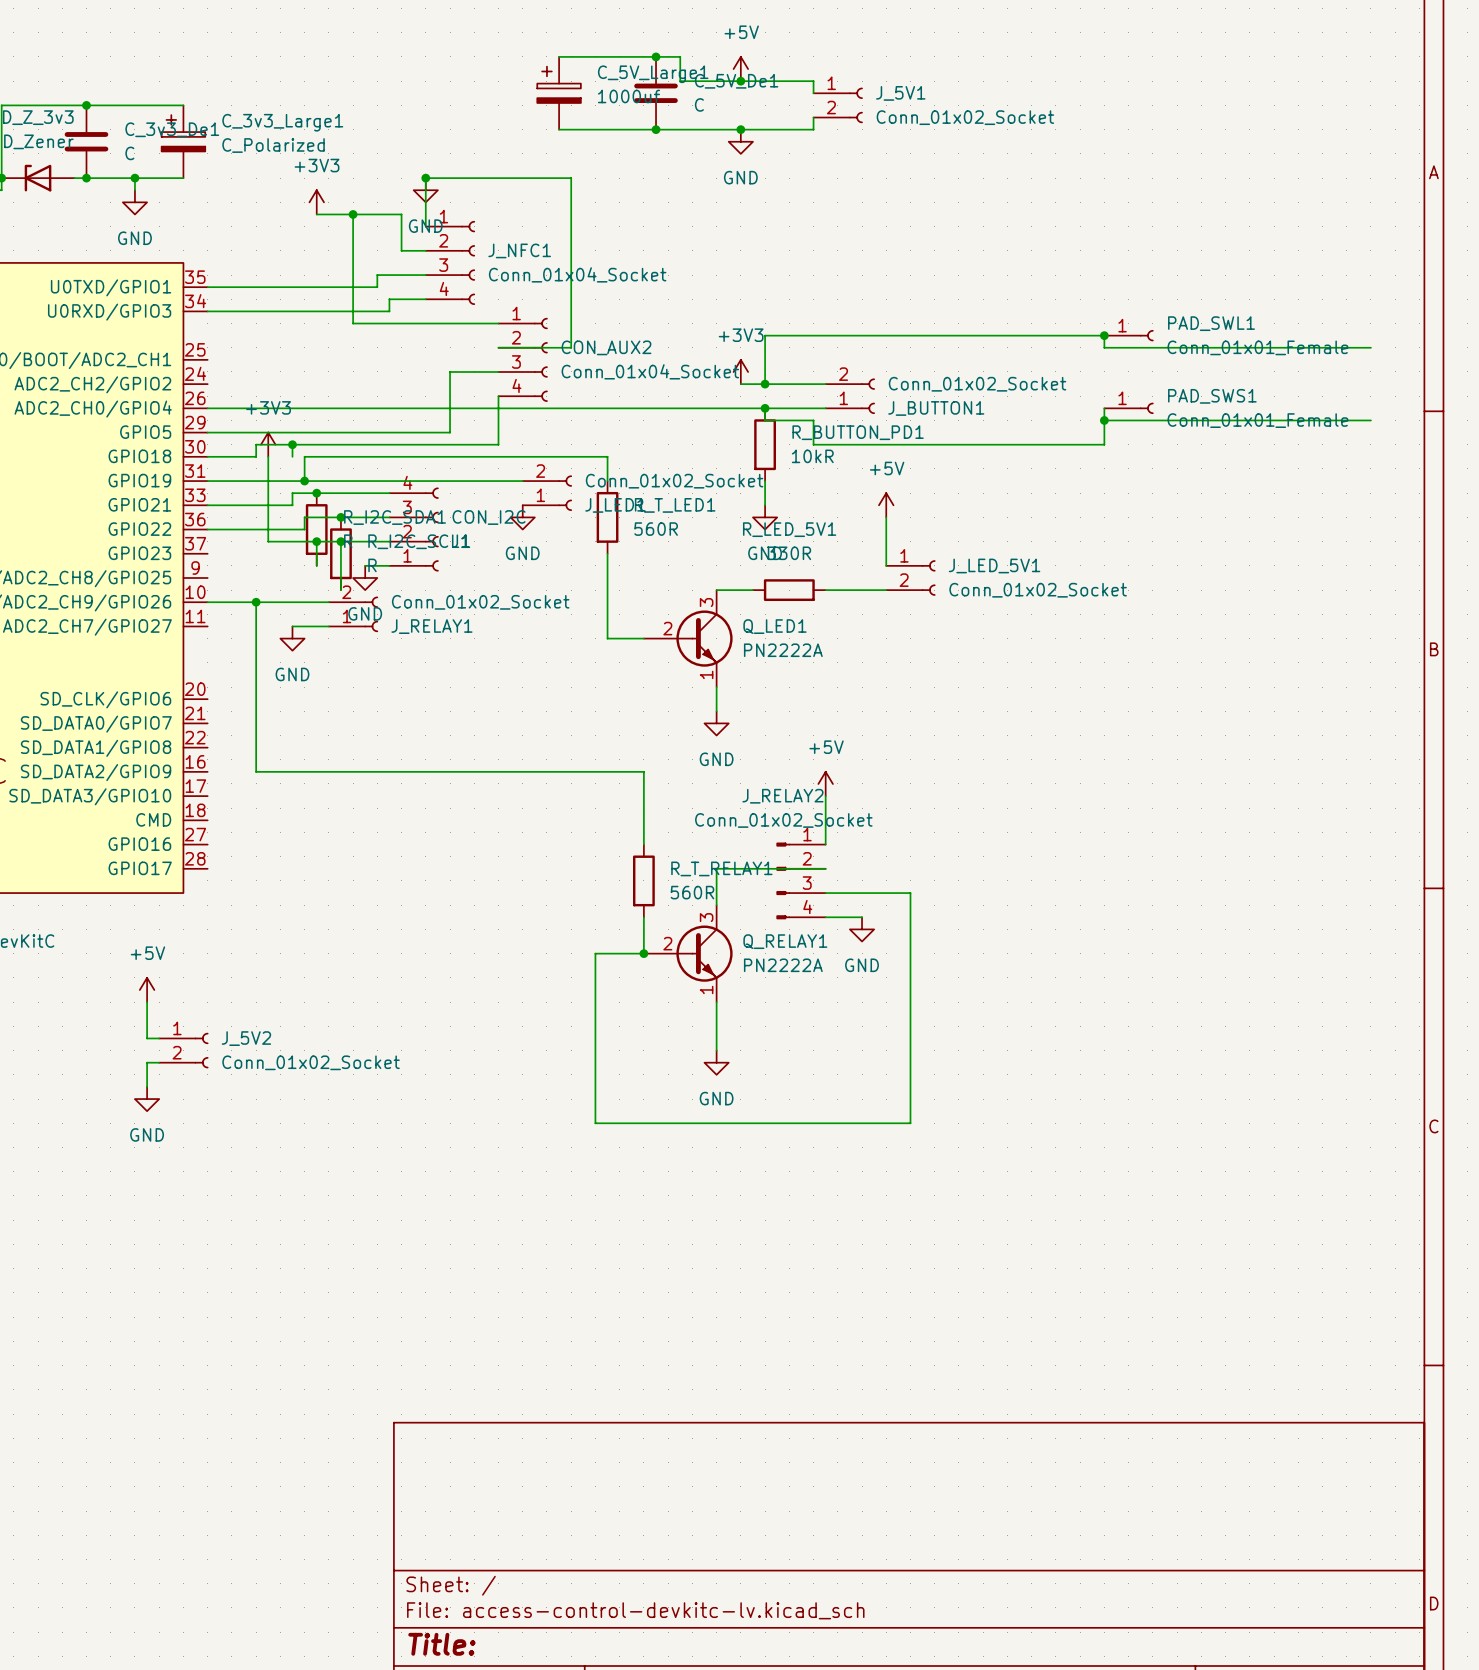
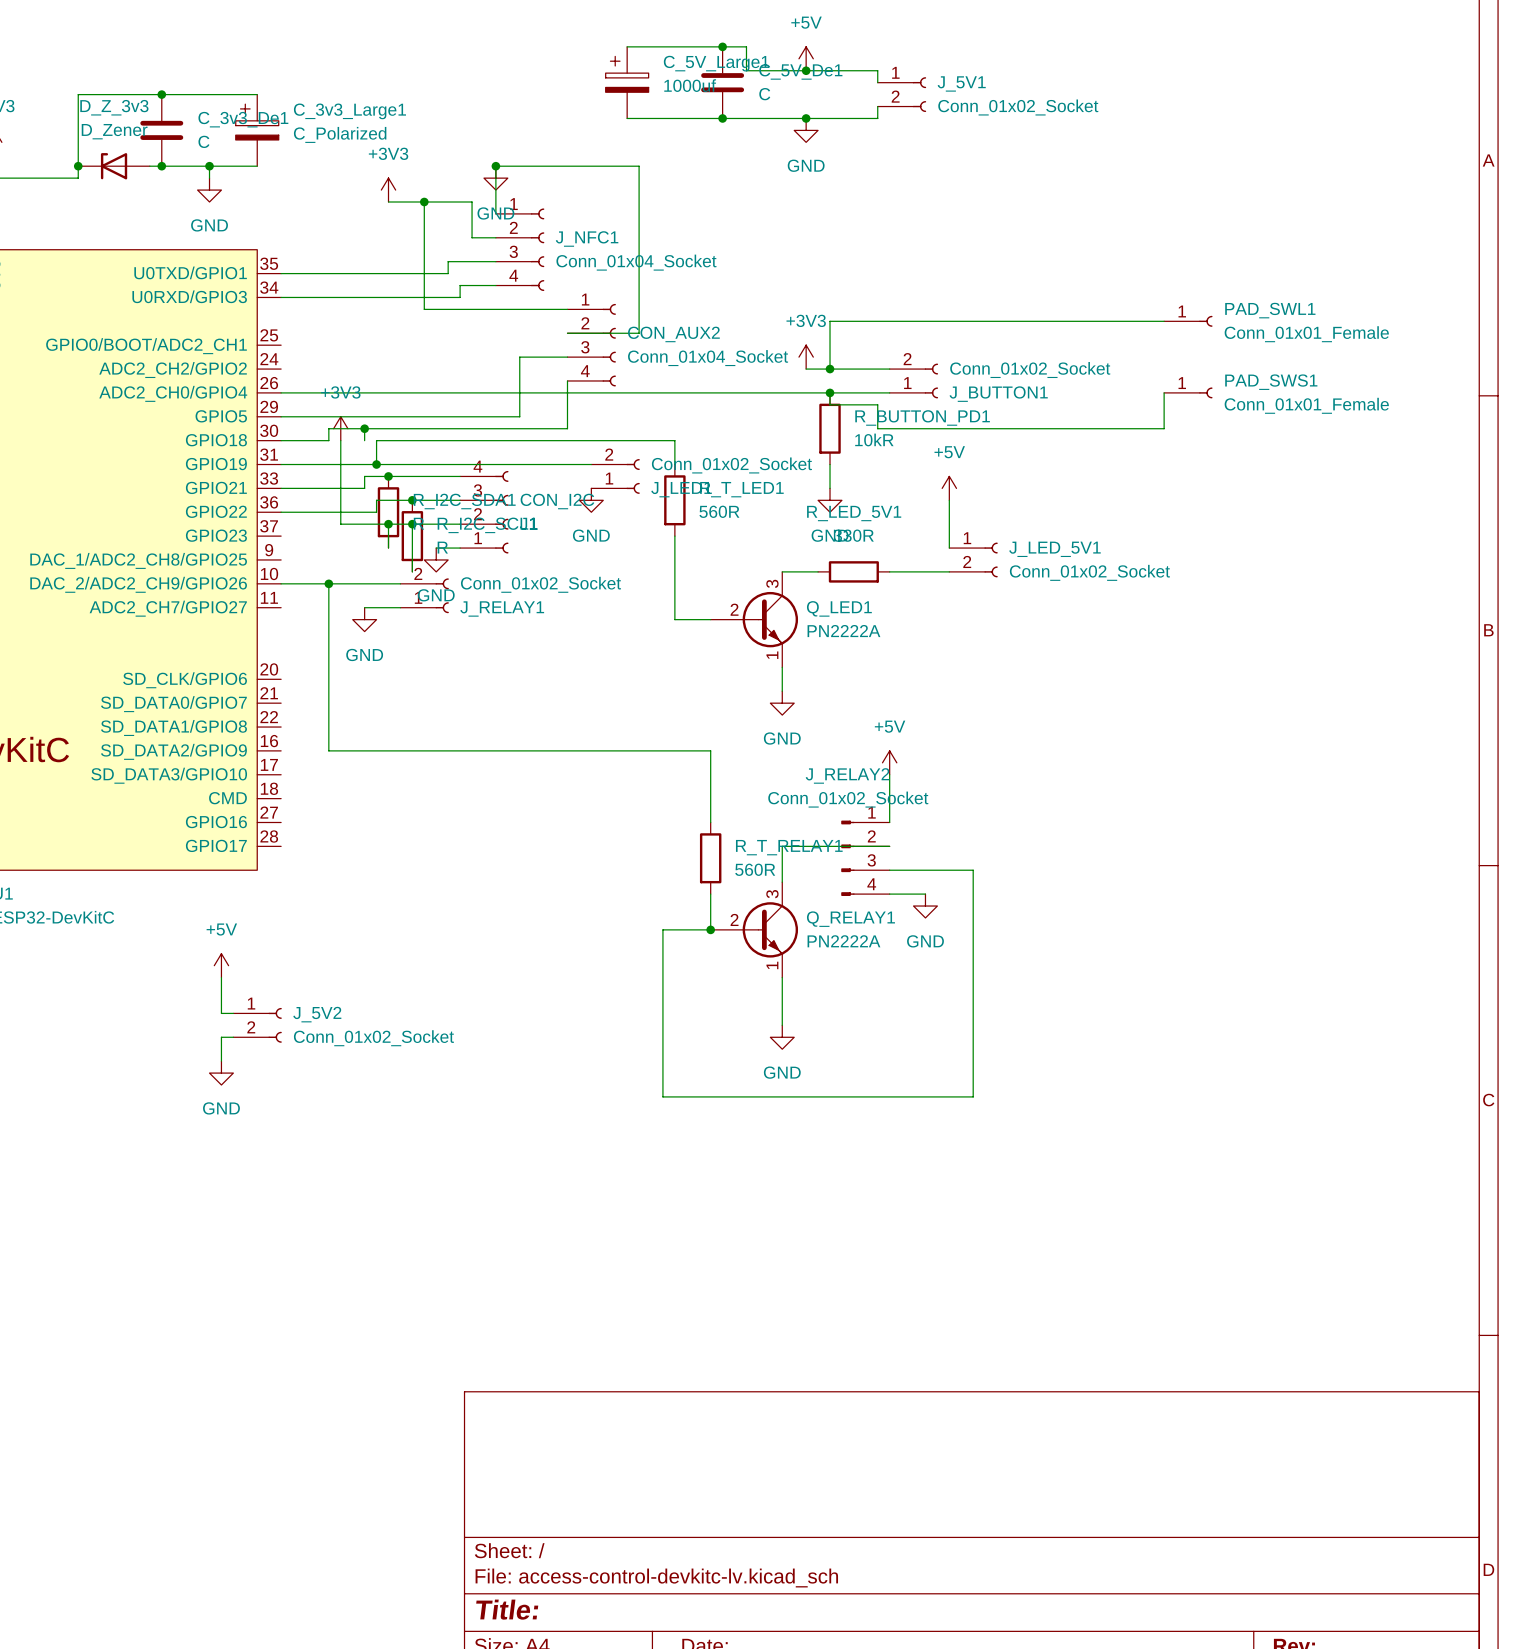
wire: (1104, 335) (1104, 347) (1370, 347) -> none
junction: (1104, 335) -> none
wire: (1104, 420) (1370, 420) -> none
junction: (1104, 420) -> none

